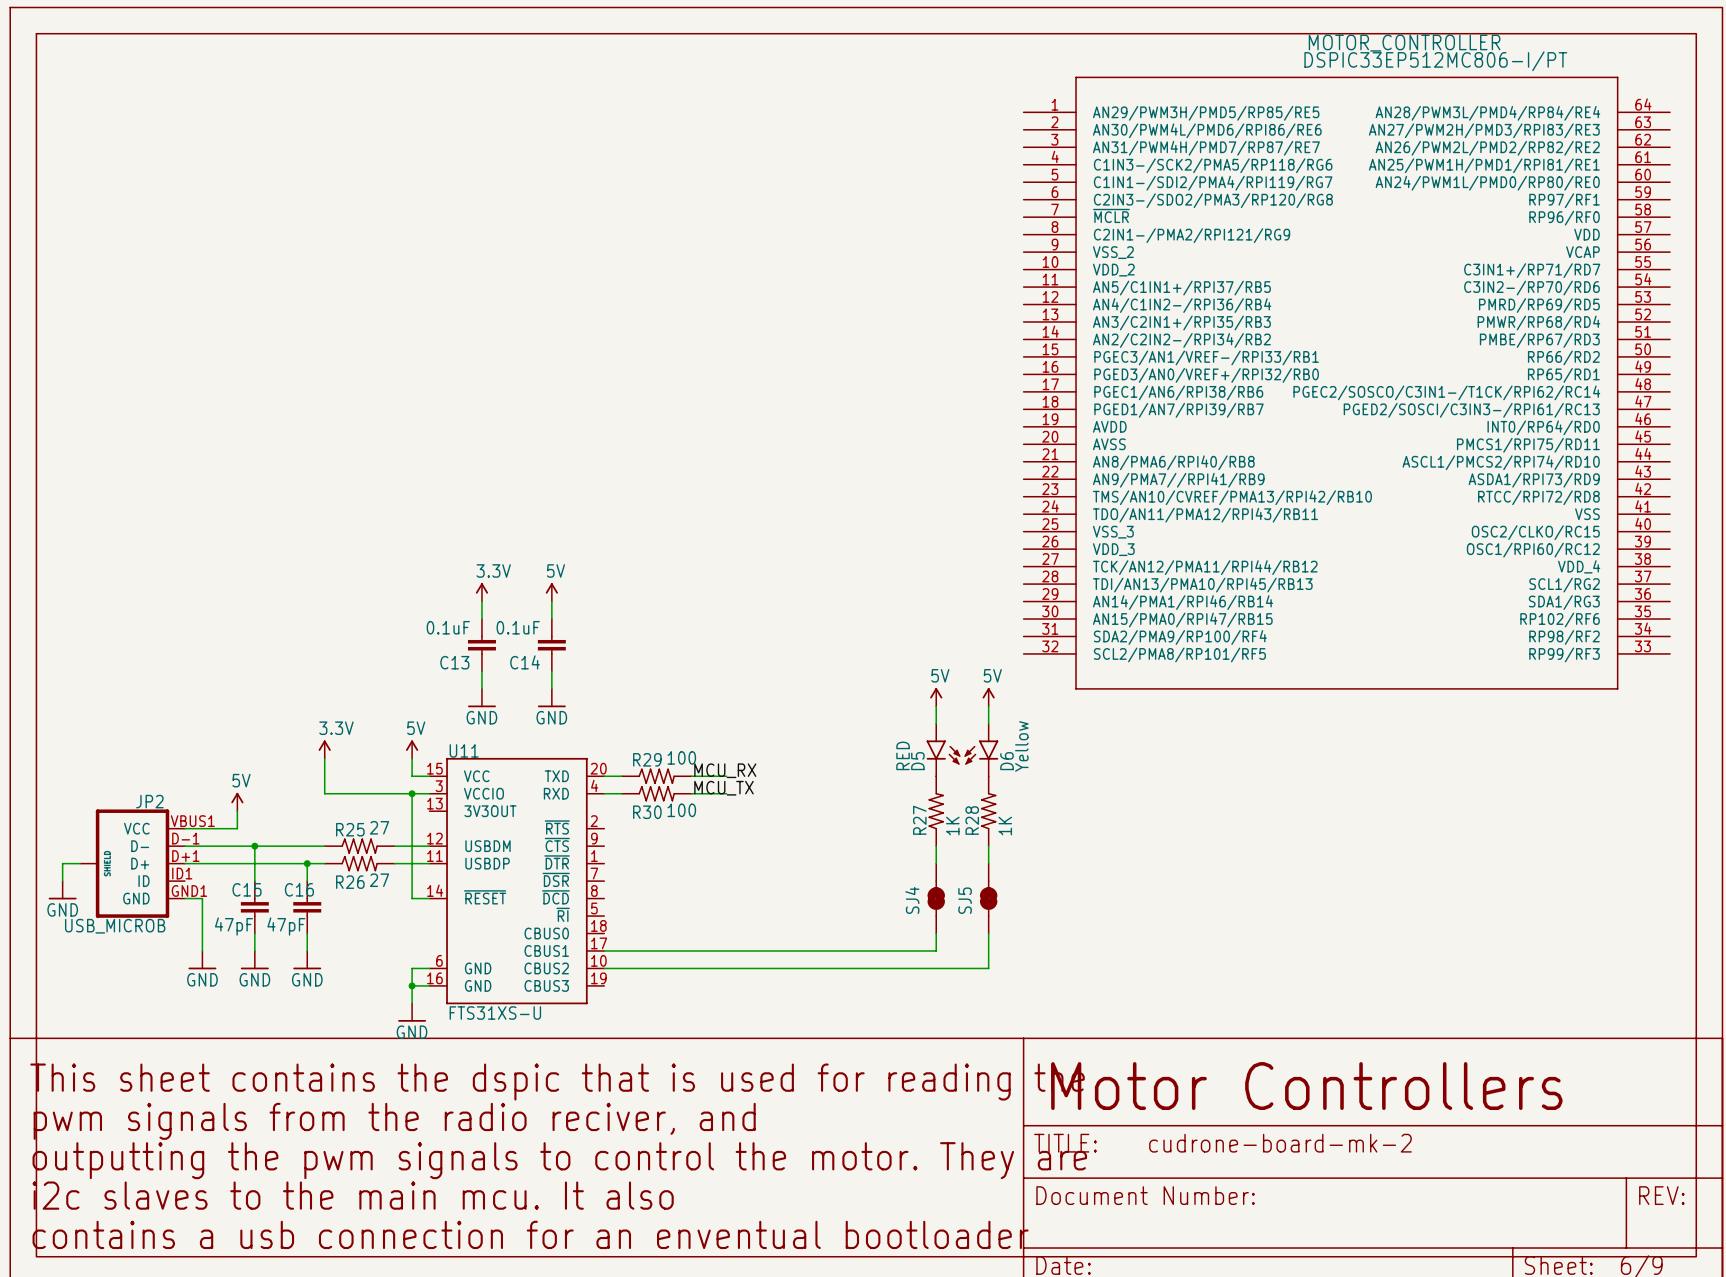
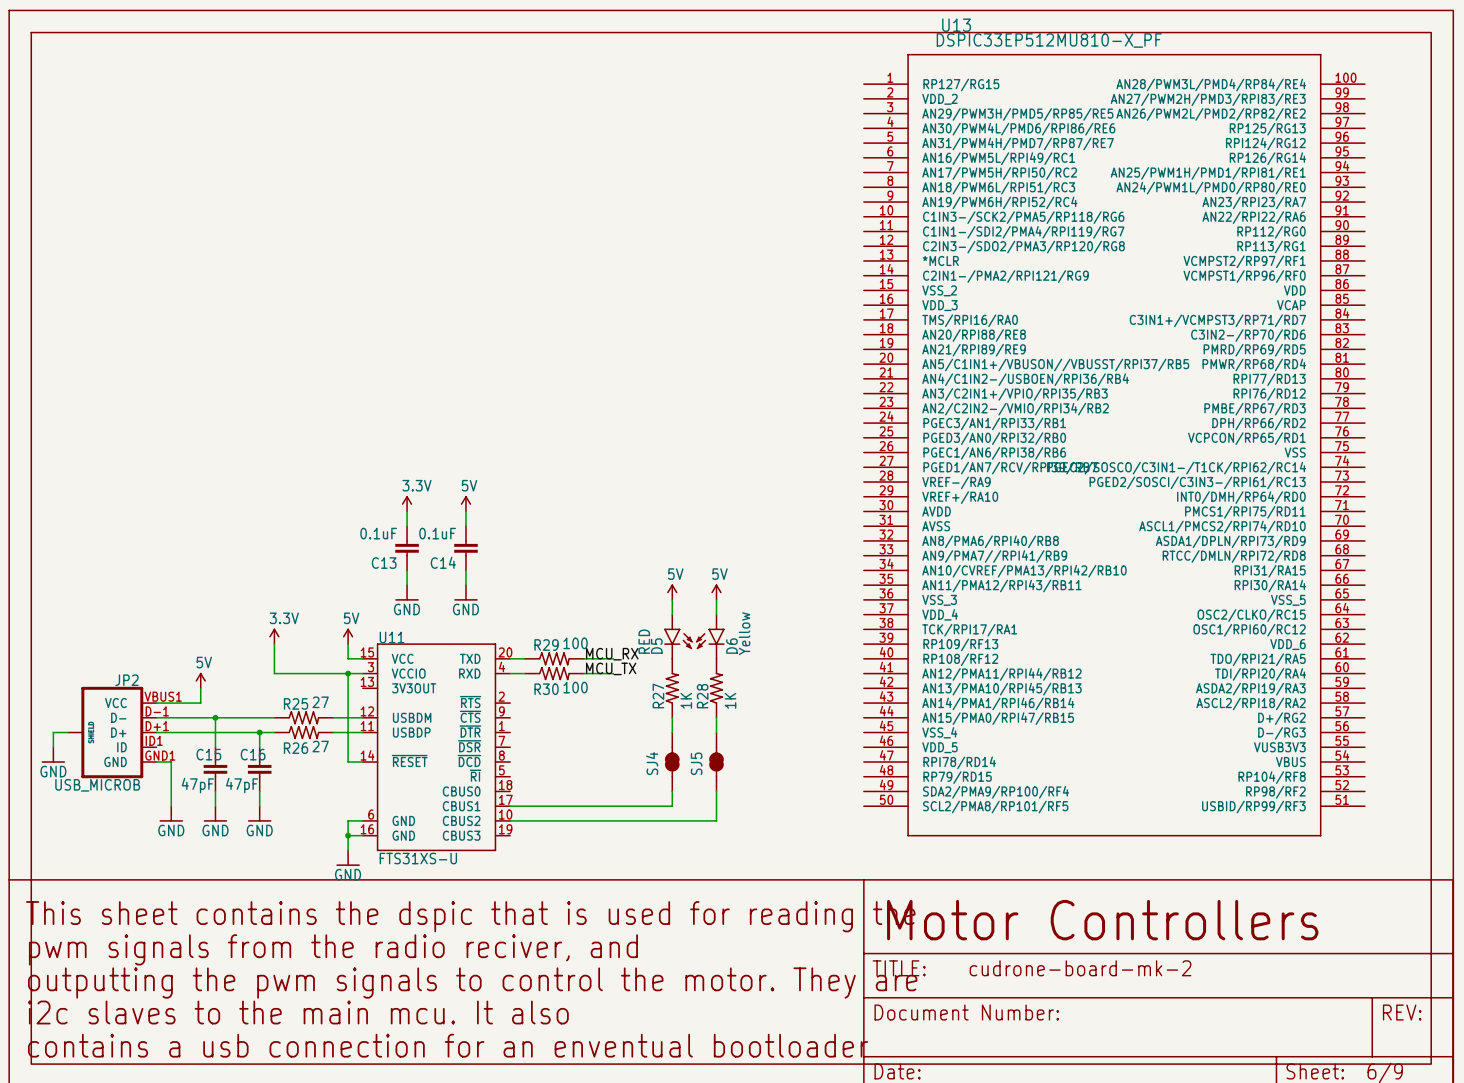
MOTOR_CONTROLLER: DSPIC33EP512MC806-I/PT (1346, 383) -> none
U13: none -> DSPIC33EP512MU810-X_PF (1114, 445)
power symbol: none -> 5V (672, 592)
power symbol: none -> 5V (716, 592)
power symbol: 5V (936, 697) -> none
power symbol: 5V (988, 697) -> none
wire: (936, 706) (936, 723) -> (672, 599) (672, 614)
wire: (988, 706) (988, 723) -> (716, 599) (716, 614)
D5 position: (943, 750) -> (678, 636)
D6 position: (981, 750) -> (710, 636)
R27 position: (936, 811) -> (672, 688)
R28 position: (988, 811) -> (716, 688)
wire: (936, 846) (936, 863) -> (672, 717) (672, 732)
wire: (988, 846) (988, 863) -> (716, 717) (716, 732)
SJ4 position: (936, 898) -> (672, 761)
SJ5 position: (988, 898) -> (716, 761)
wire: (936, 933) (936, 950) (796, 950) -> (672, 791) (672, 806)
wire: (988, 933) (988, 968) (848, 968) -> (716, 791) (716, 820)

